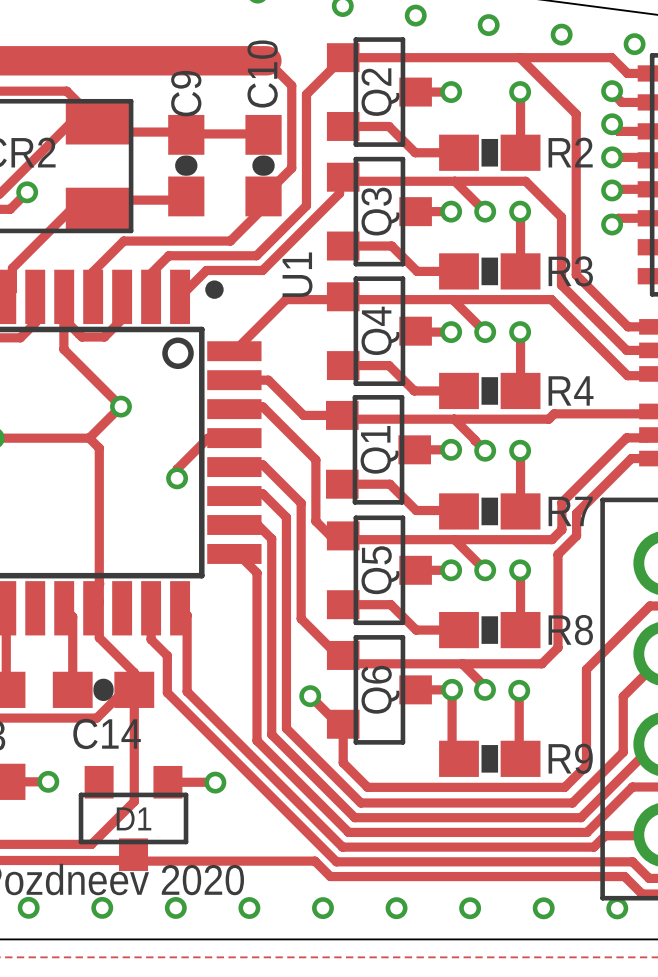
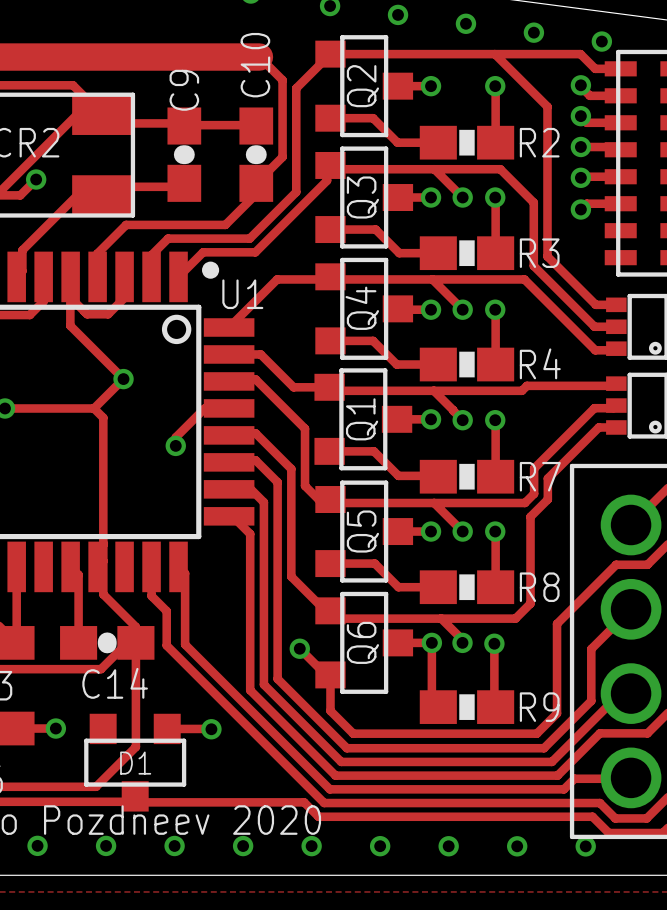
U1 name rotation: 0° (297, 274) -> 90° clockwise (242, 294)

